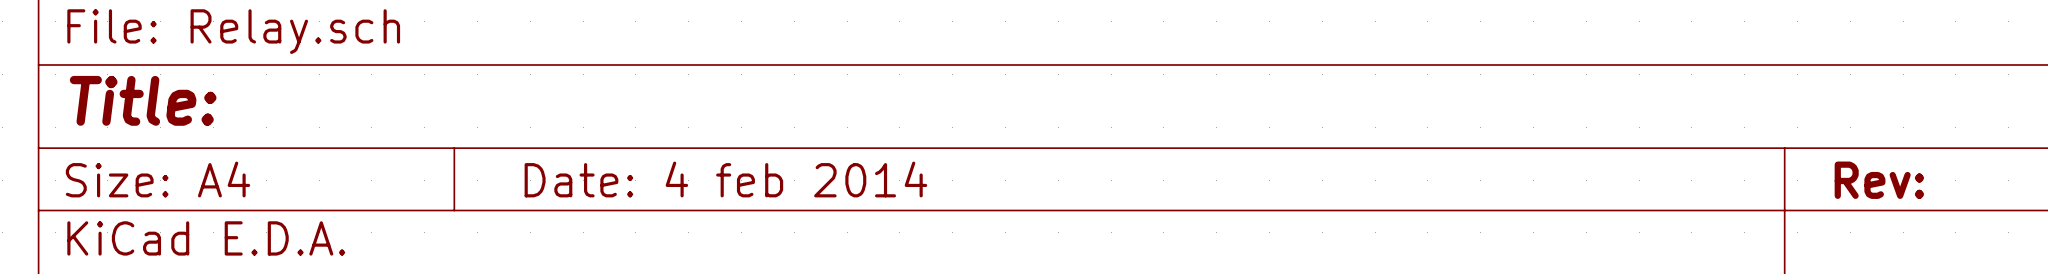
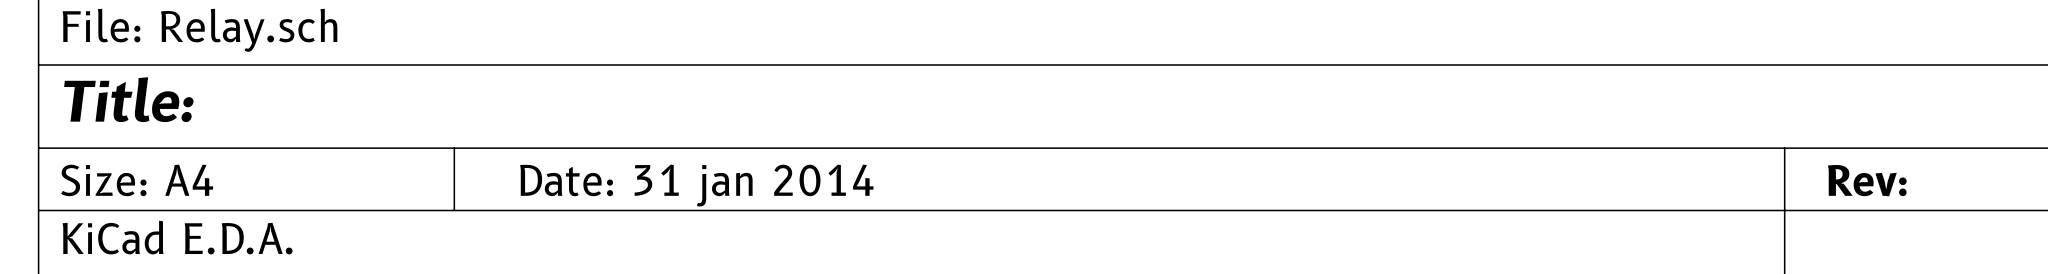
title block: Date: 4 feb 2014 (725, 179) -> Date: 31 jan 2014 (696, 185)

